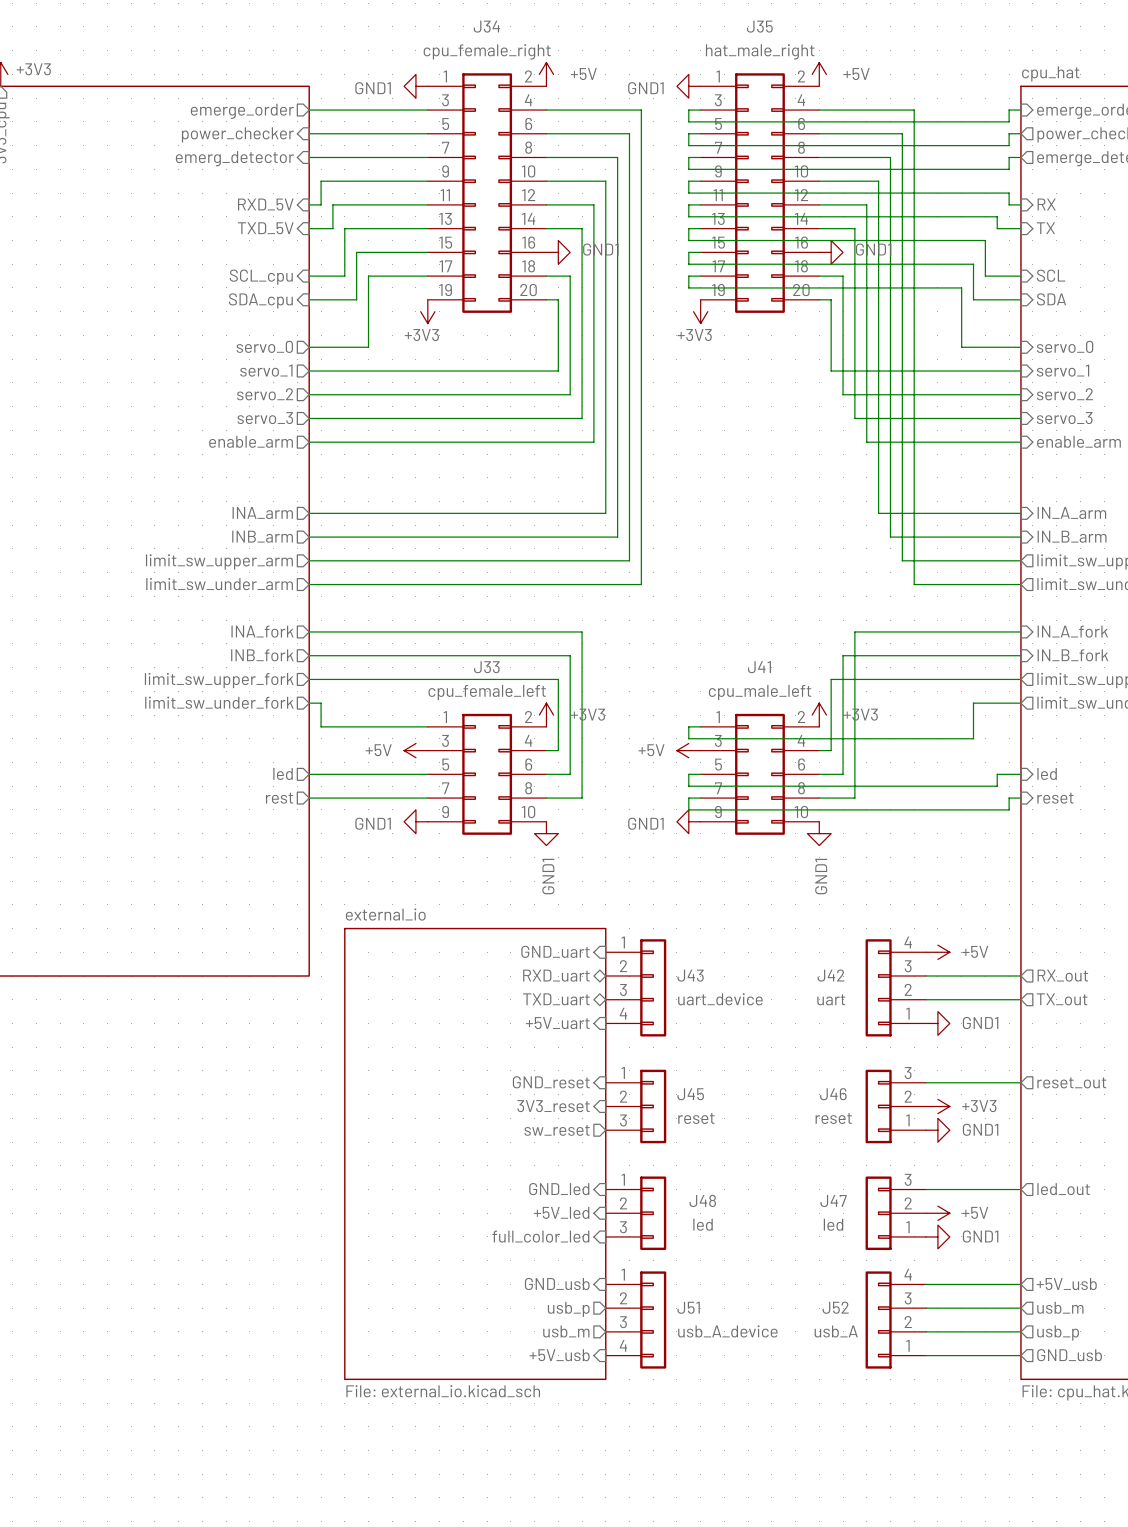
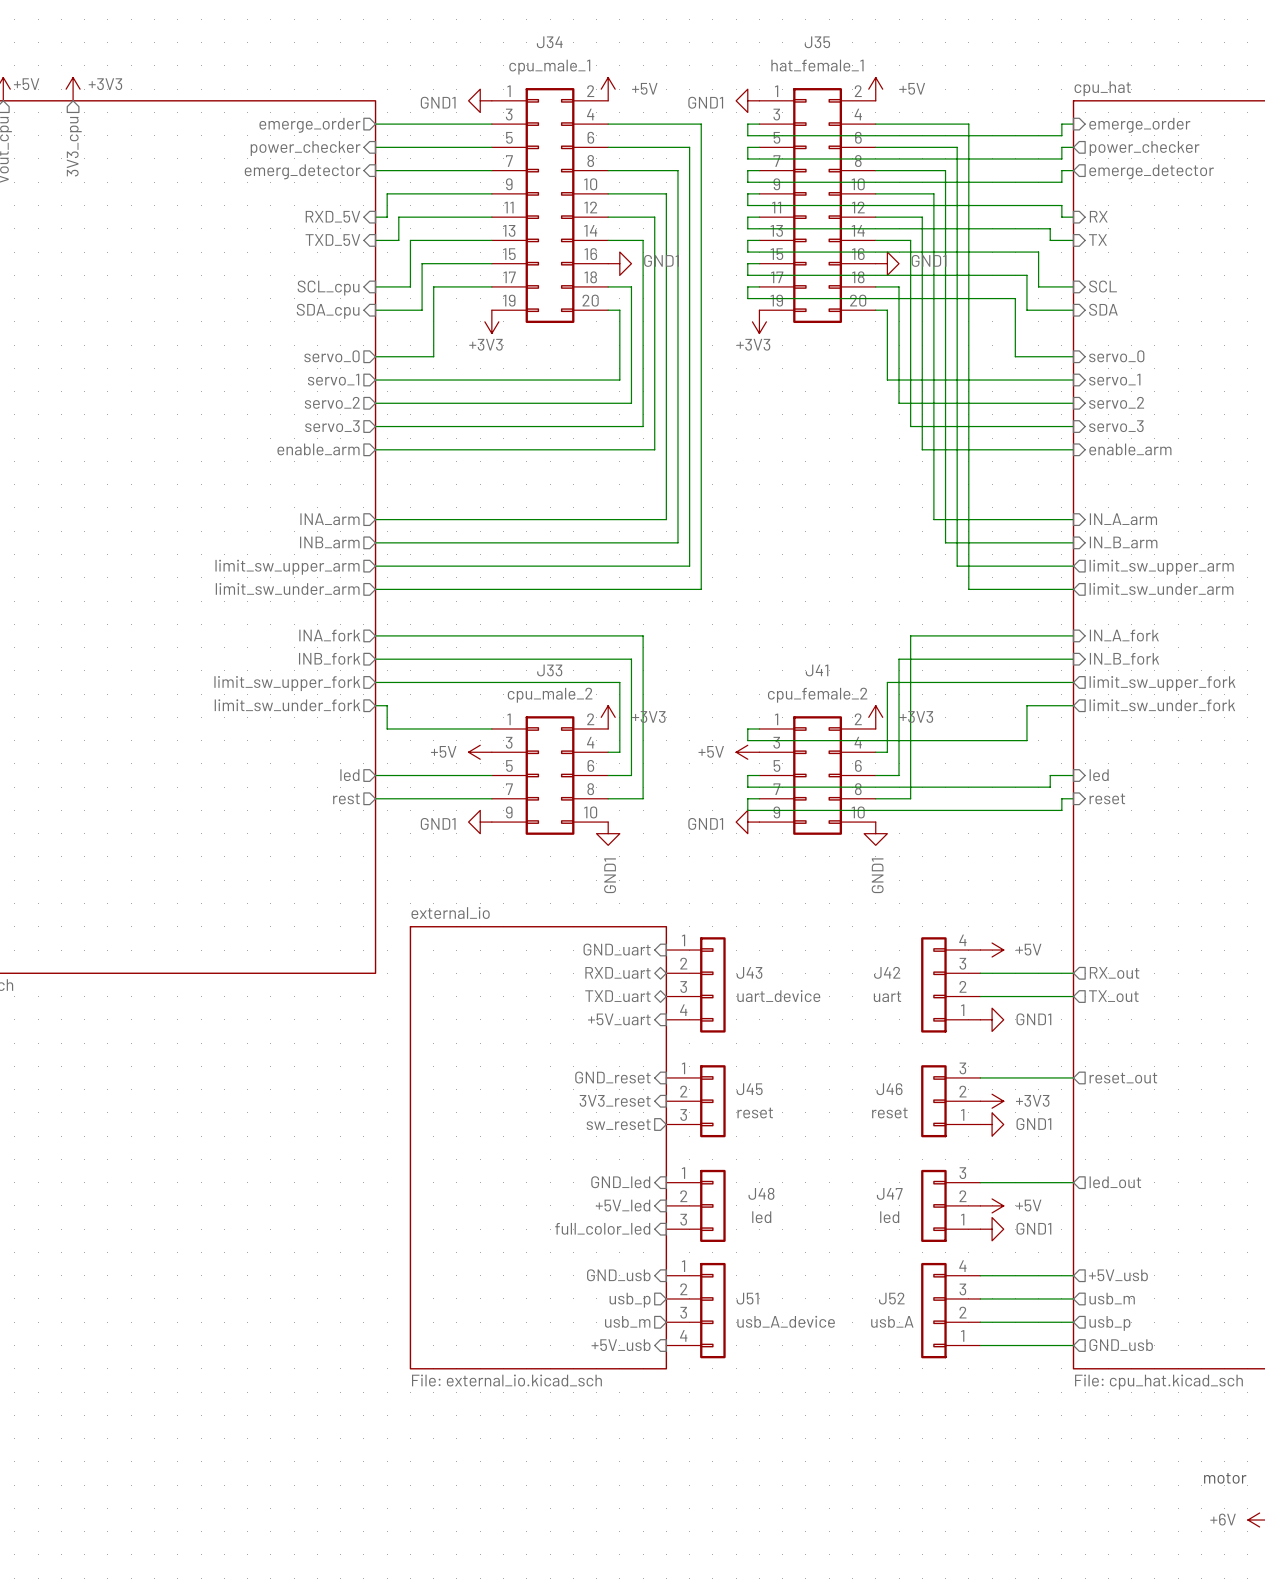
J34 value: cpu_female_right (487, 51) -> cpu_male_1 (549, 67)
J35 value: hat_male_right (760, 51) -> hat_female_1 (817, 65)
J33 value: cpu_female_left (487, 692) -> cpu_male_2 (550, 695)
J41 value: cpu_male_left (760, 692) -> cpu_female_2 (817, 695)

